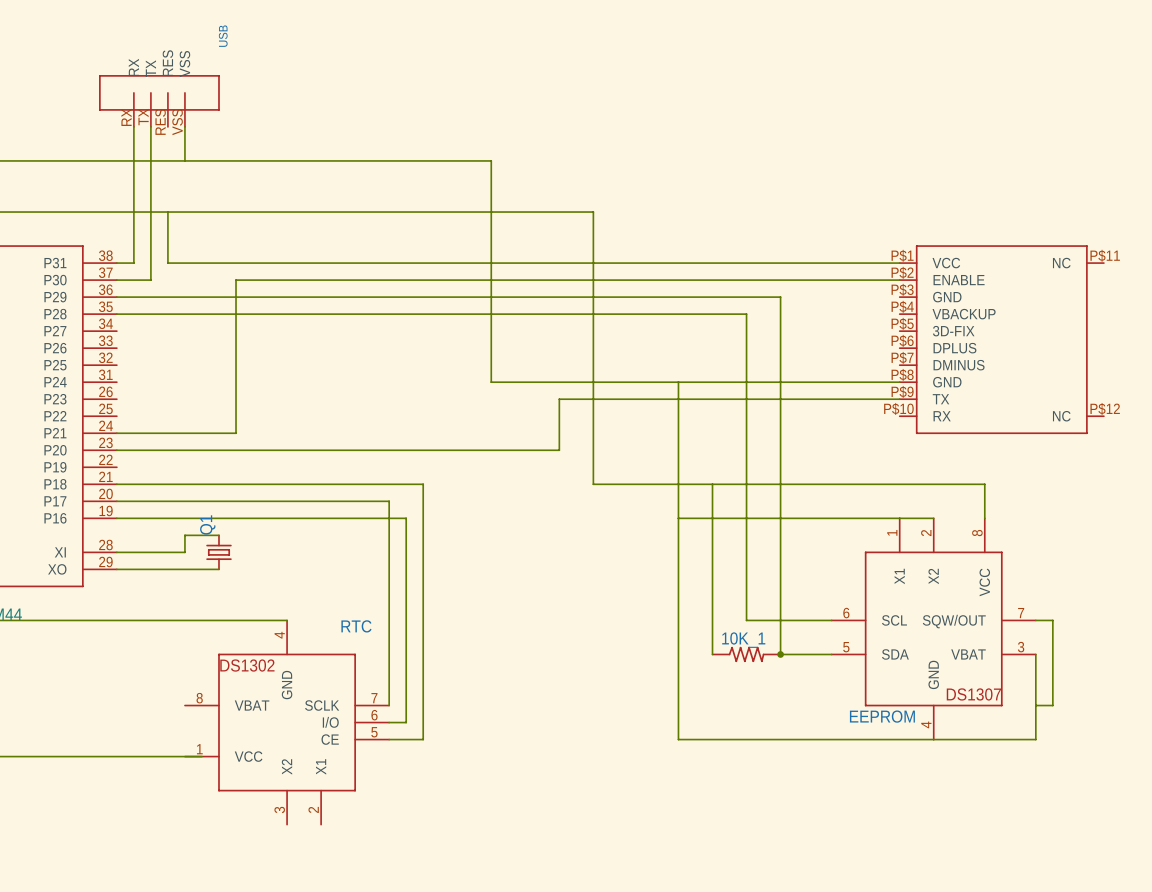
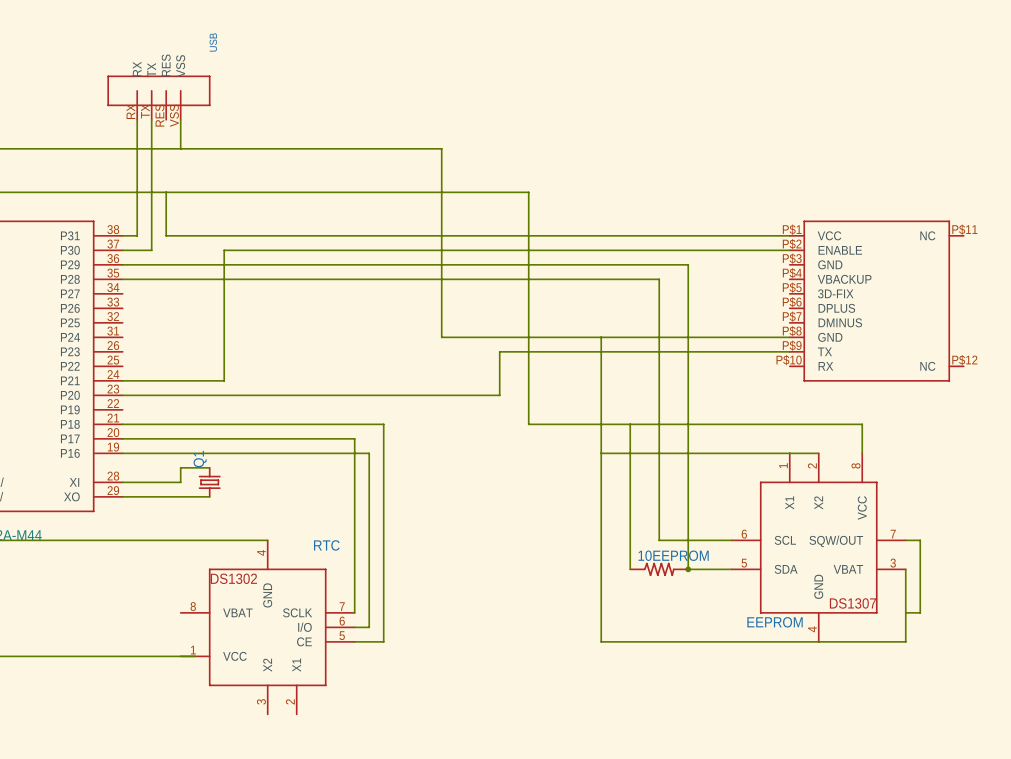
10K_1 name: 10K_1 (743, 640) -> 10EEPROM (673, 555)

